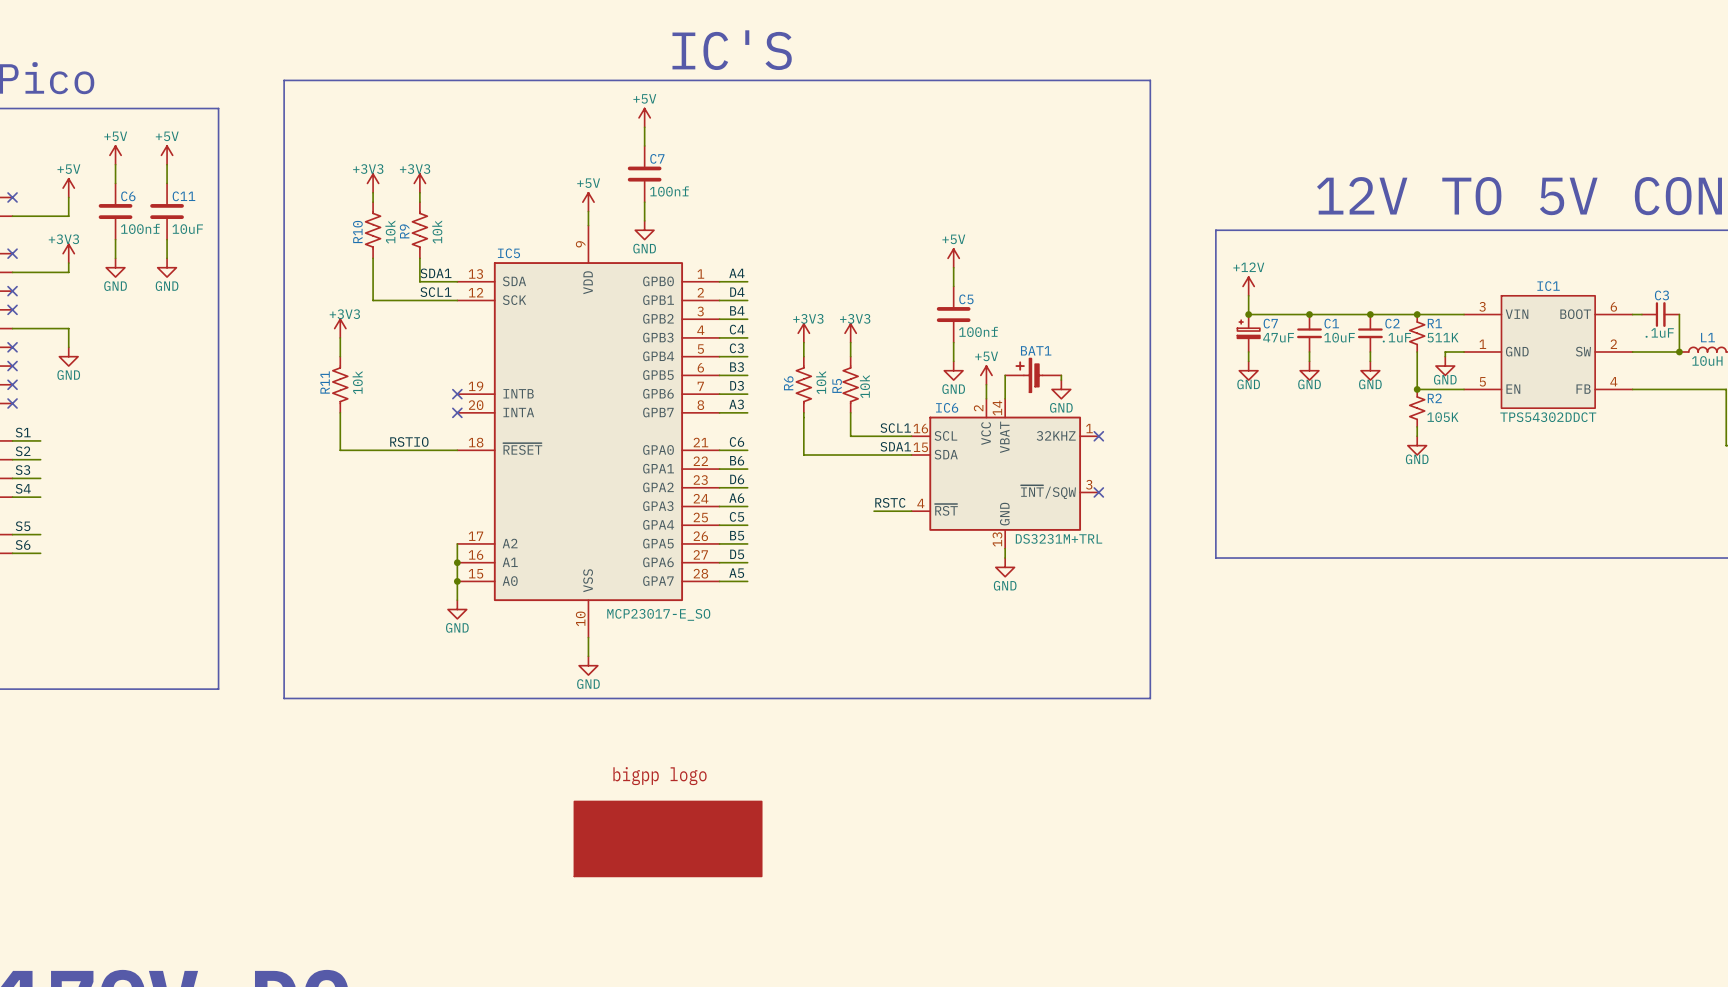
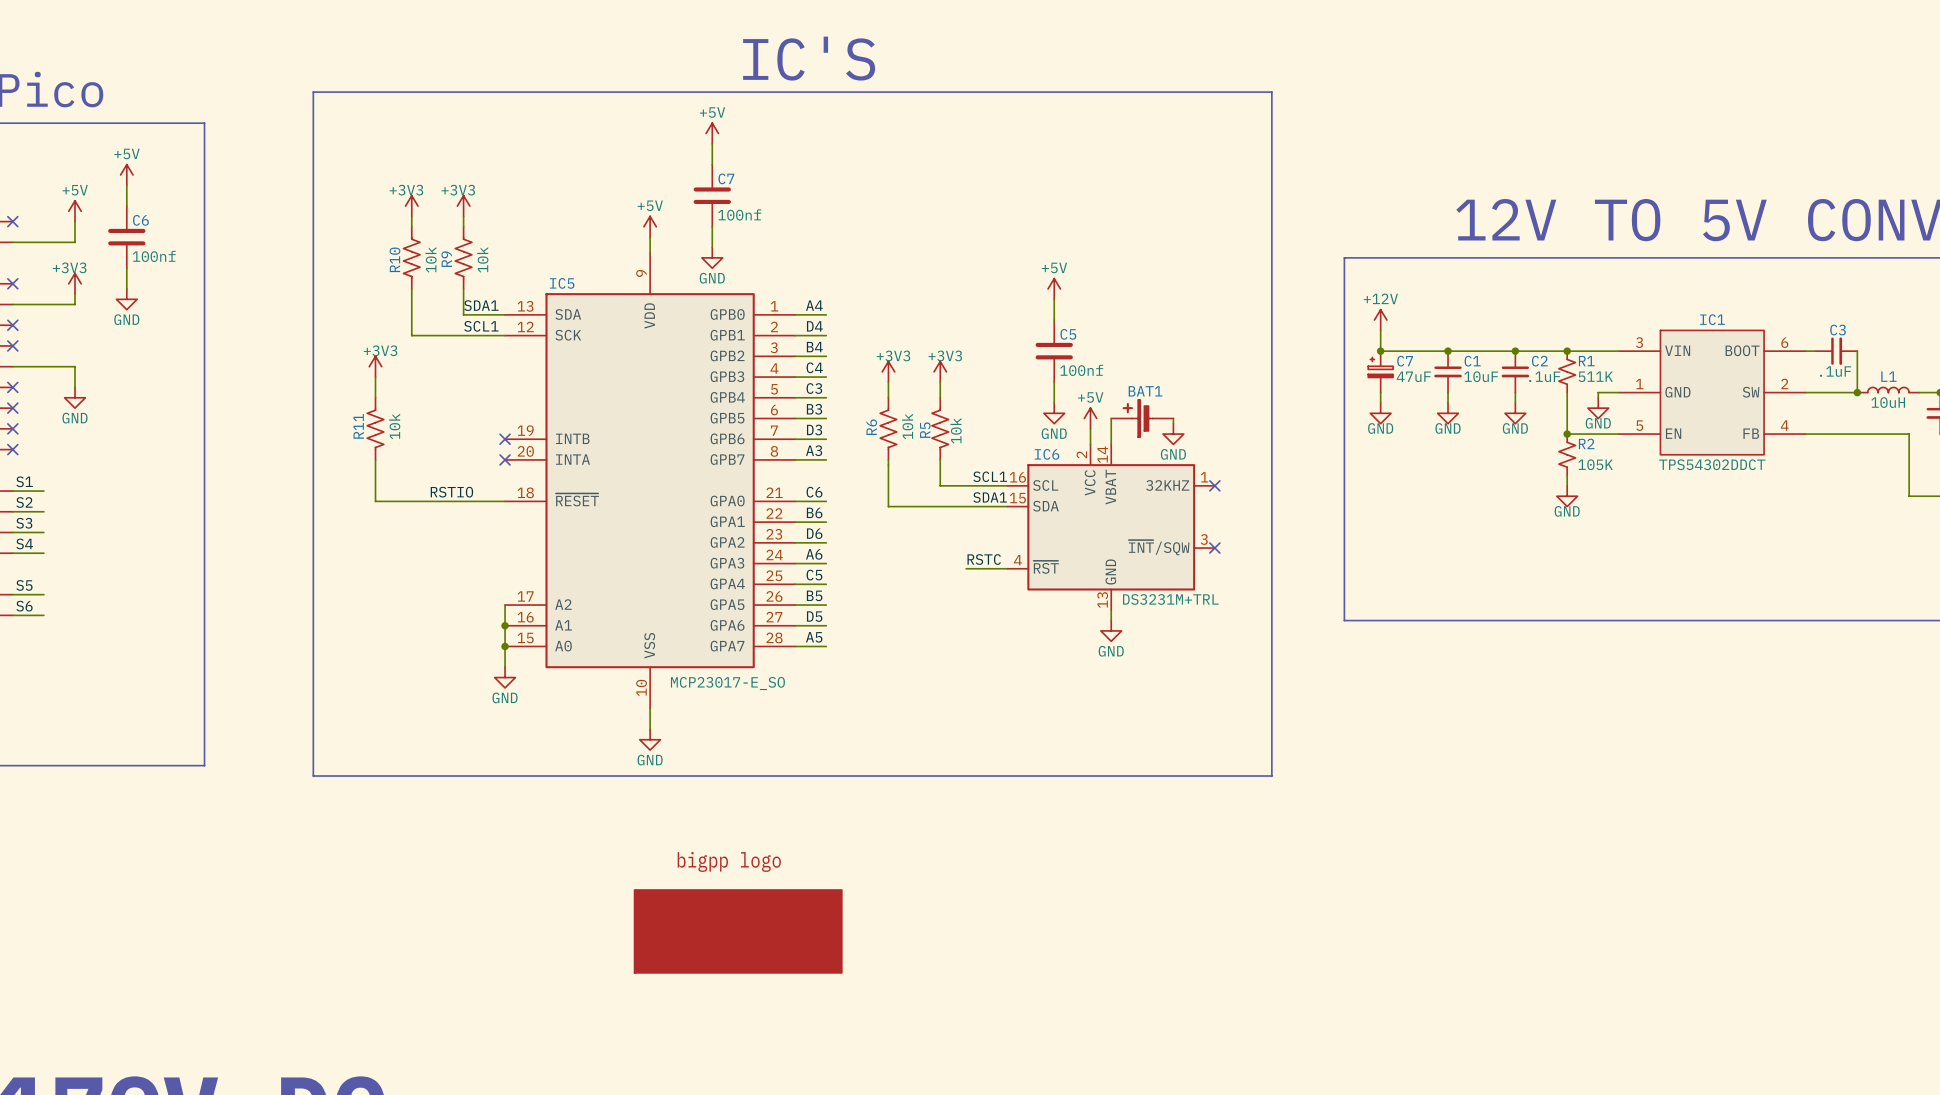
line: (185, 108) (218, 108) (218, 689) (185, 689) -> (204, 123) (204, 765)
power symbol: +5V (167, 155) -> none
wire: (167, 164) (167, 183) -> none
C11: 10uF (167, 211) -> none
wire: (167, 239) (167, 258) -> none
power symbol: GND (167, 267) -> none

